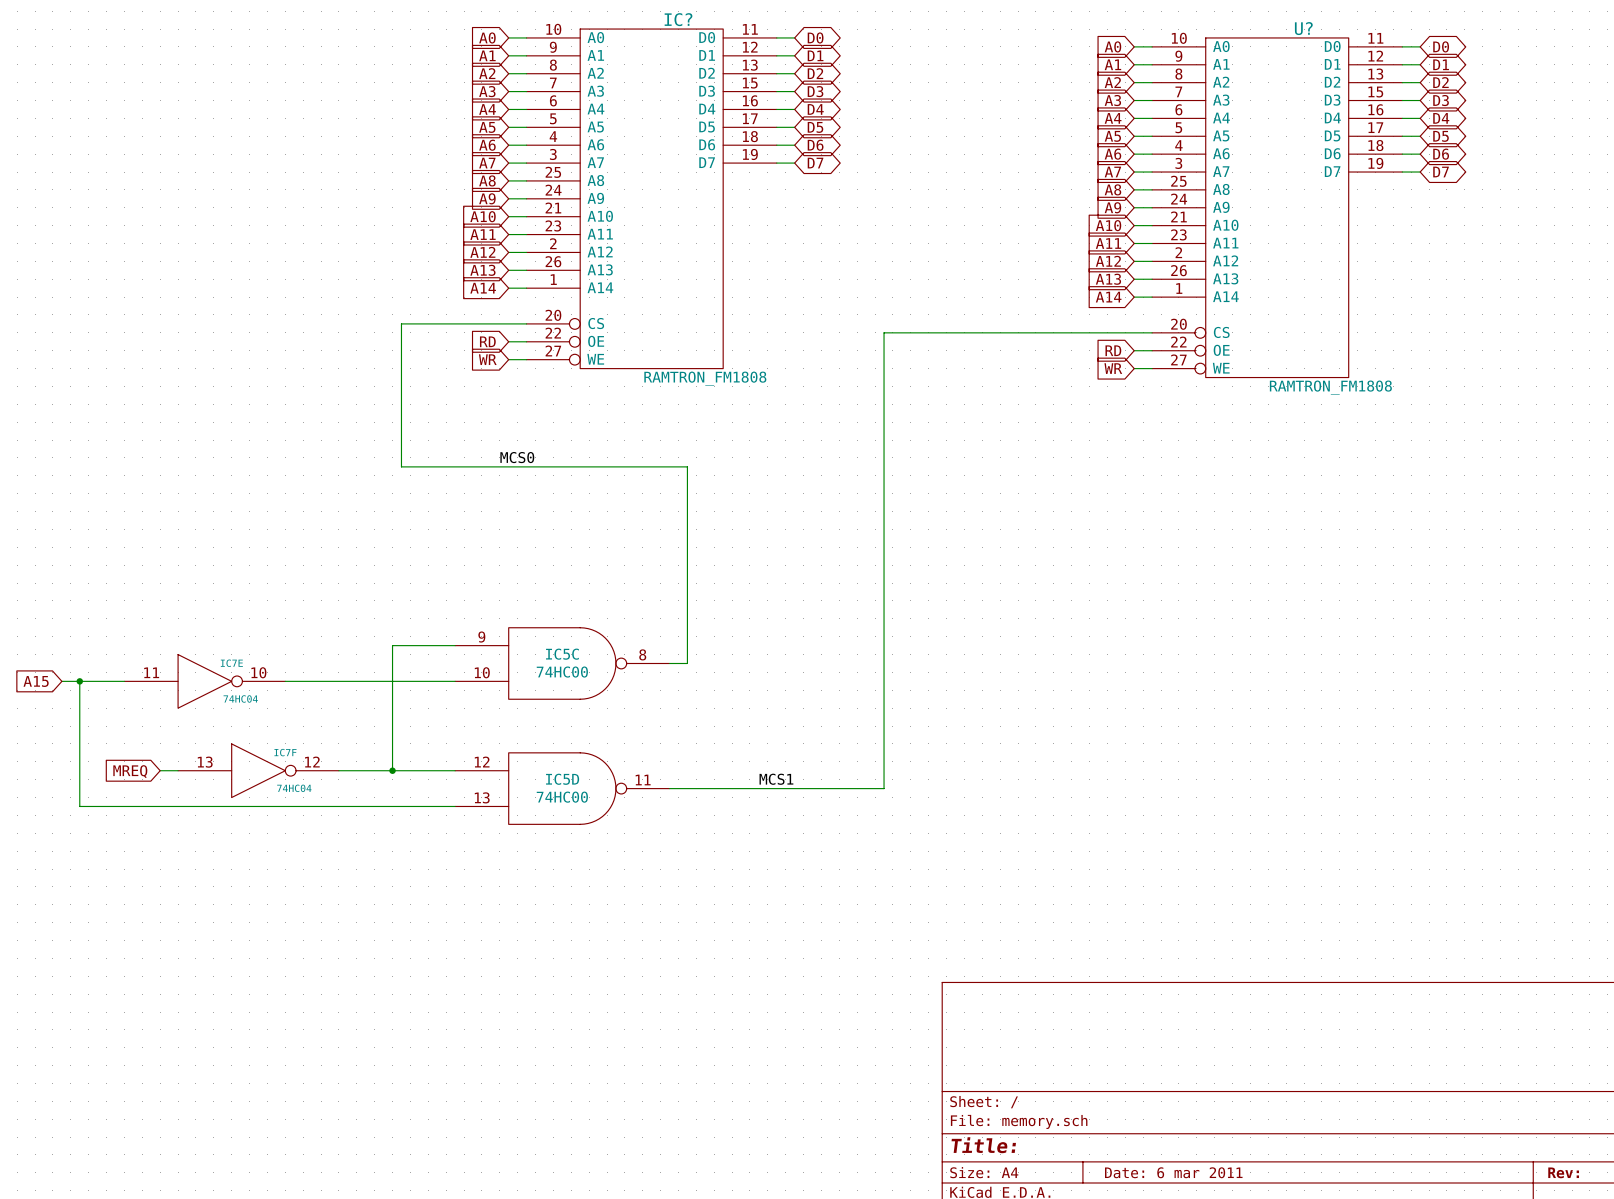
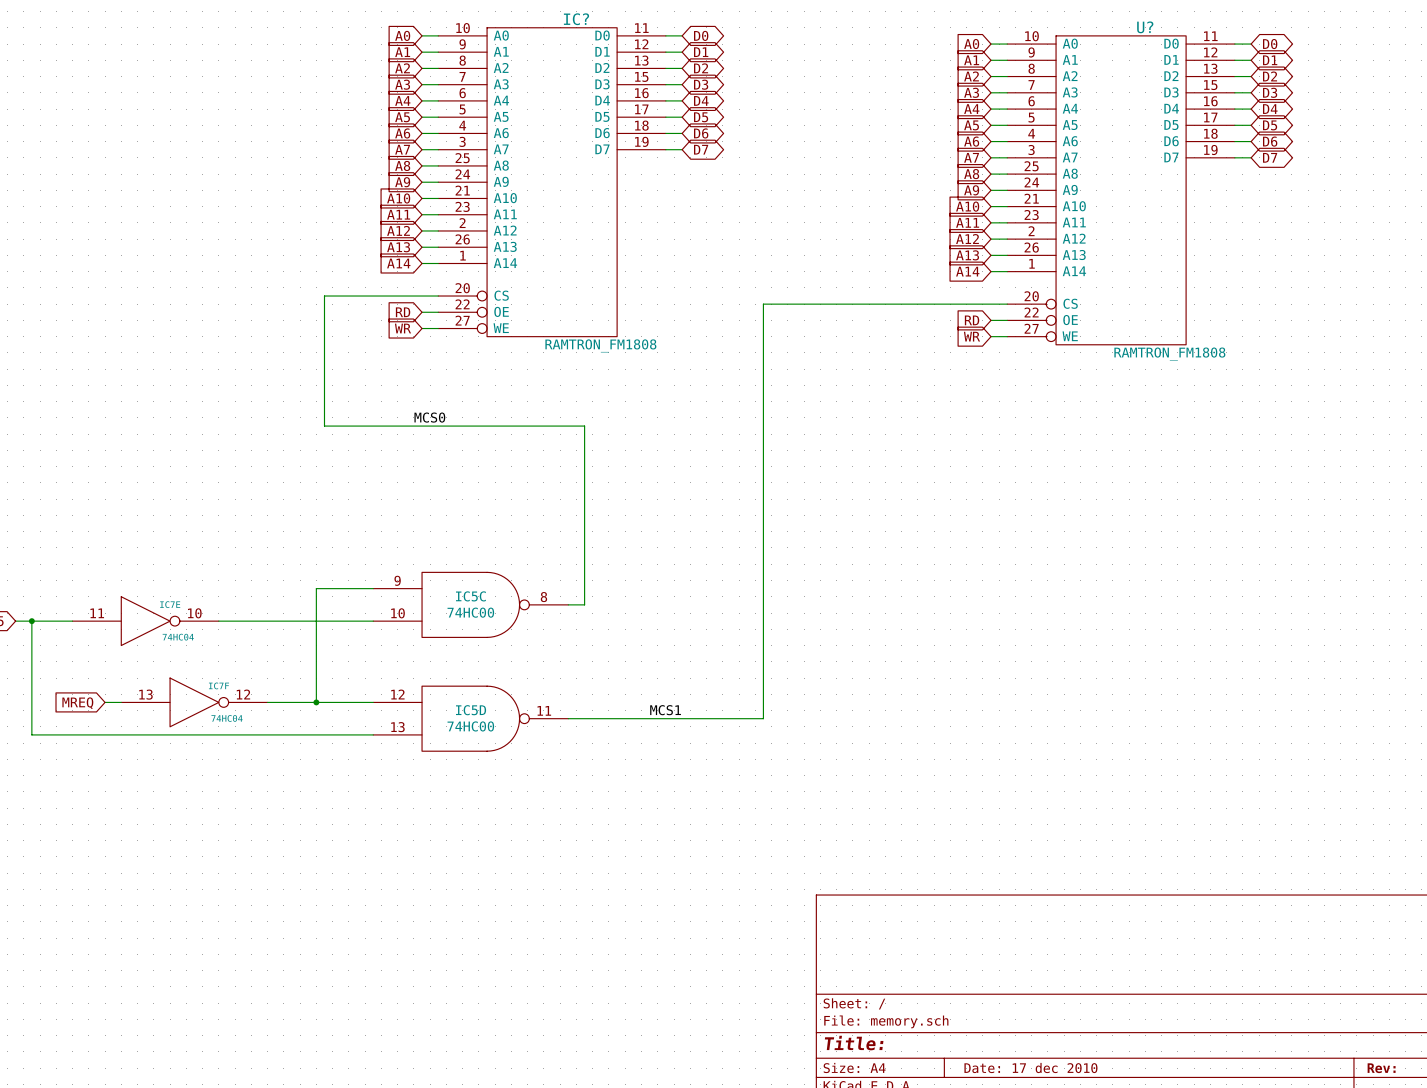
title block: Date: 6 mar 2011 (1173, 1172) -> Date: 17 dec 2010 (1030, 1068)

